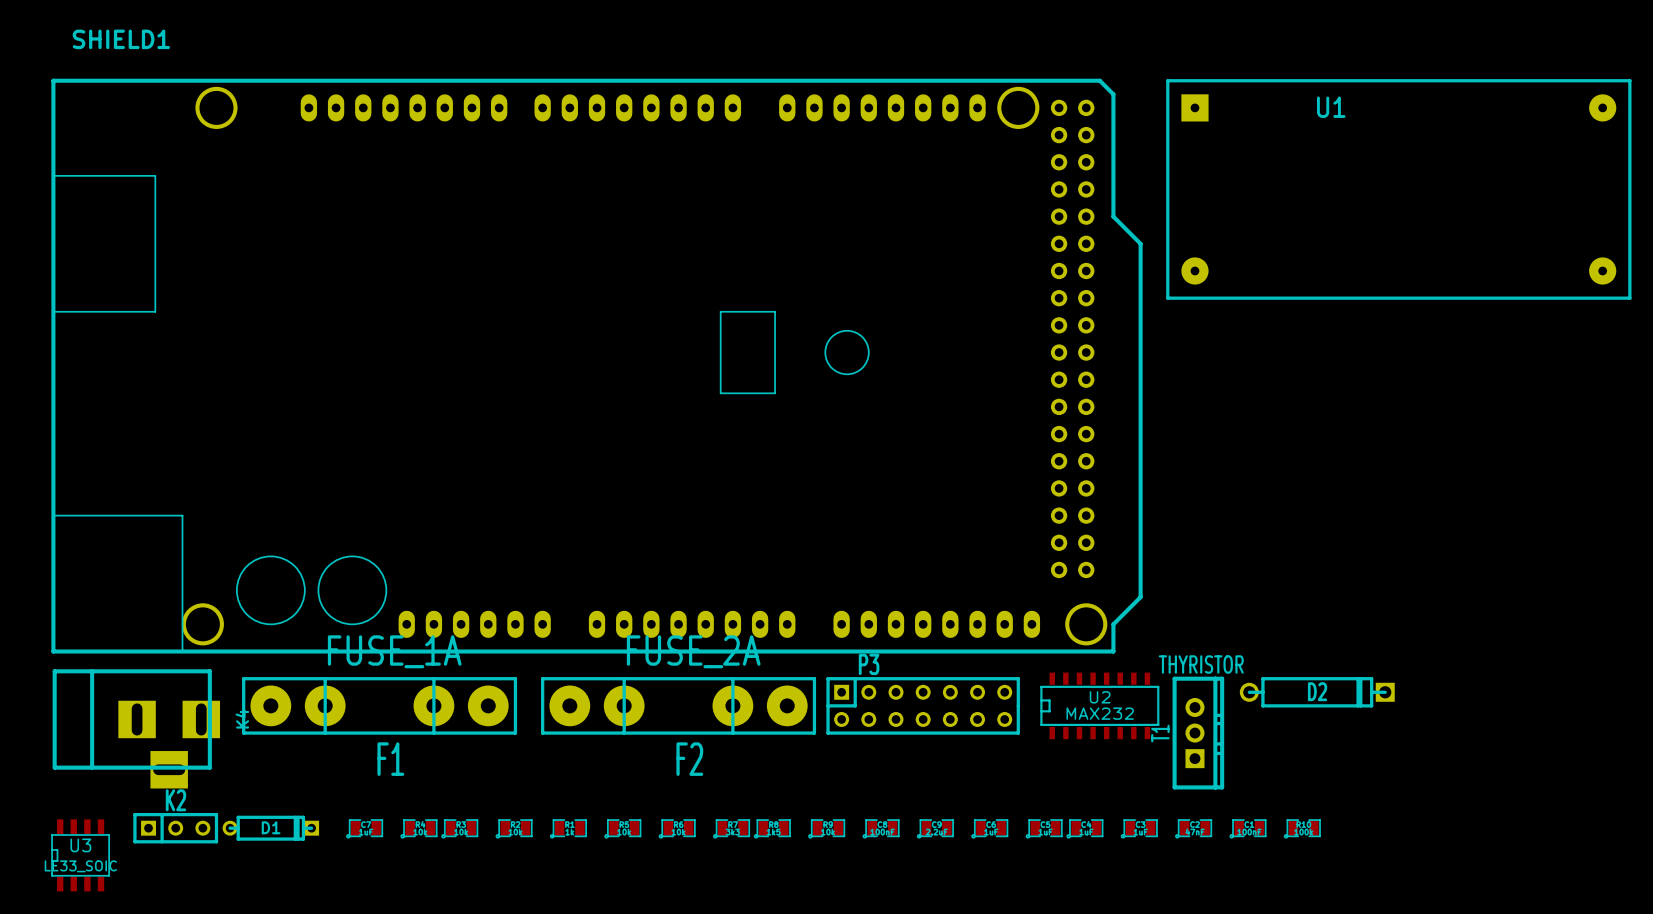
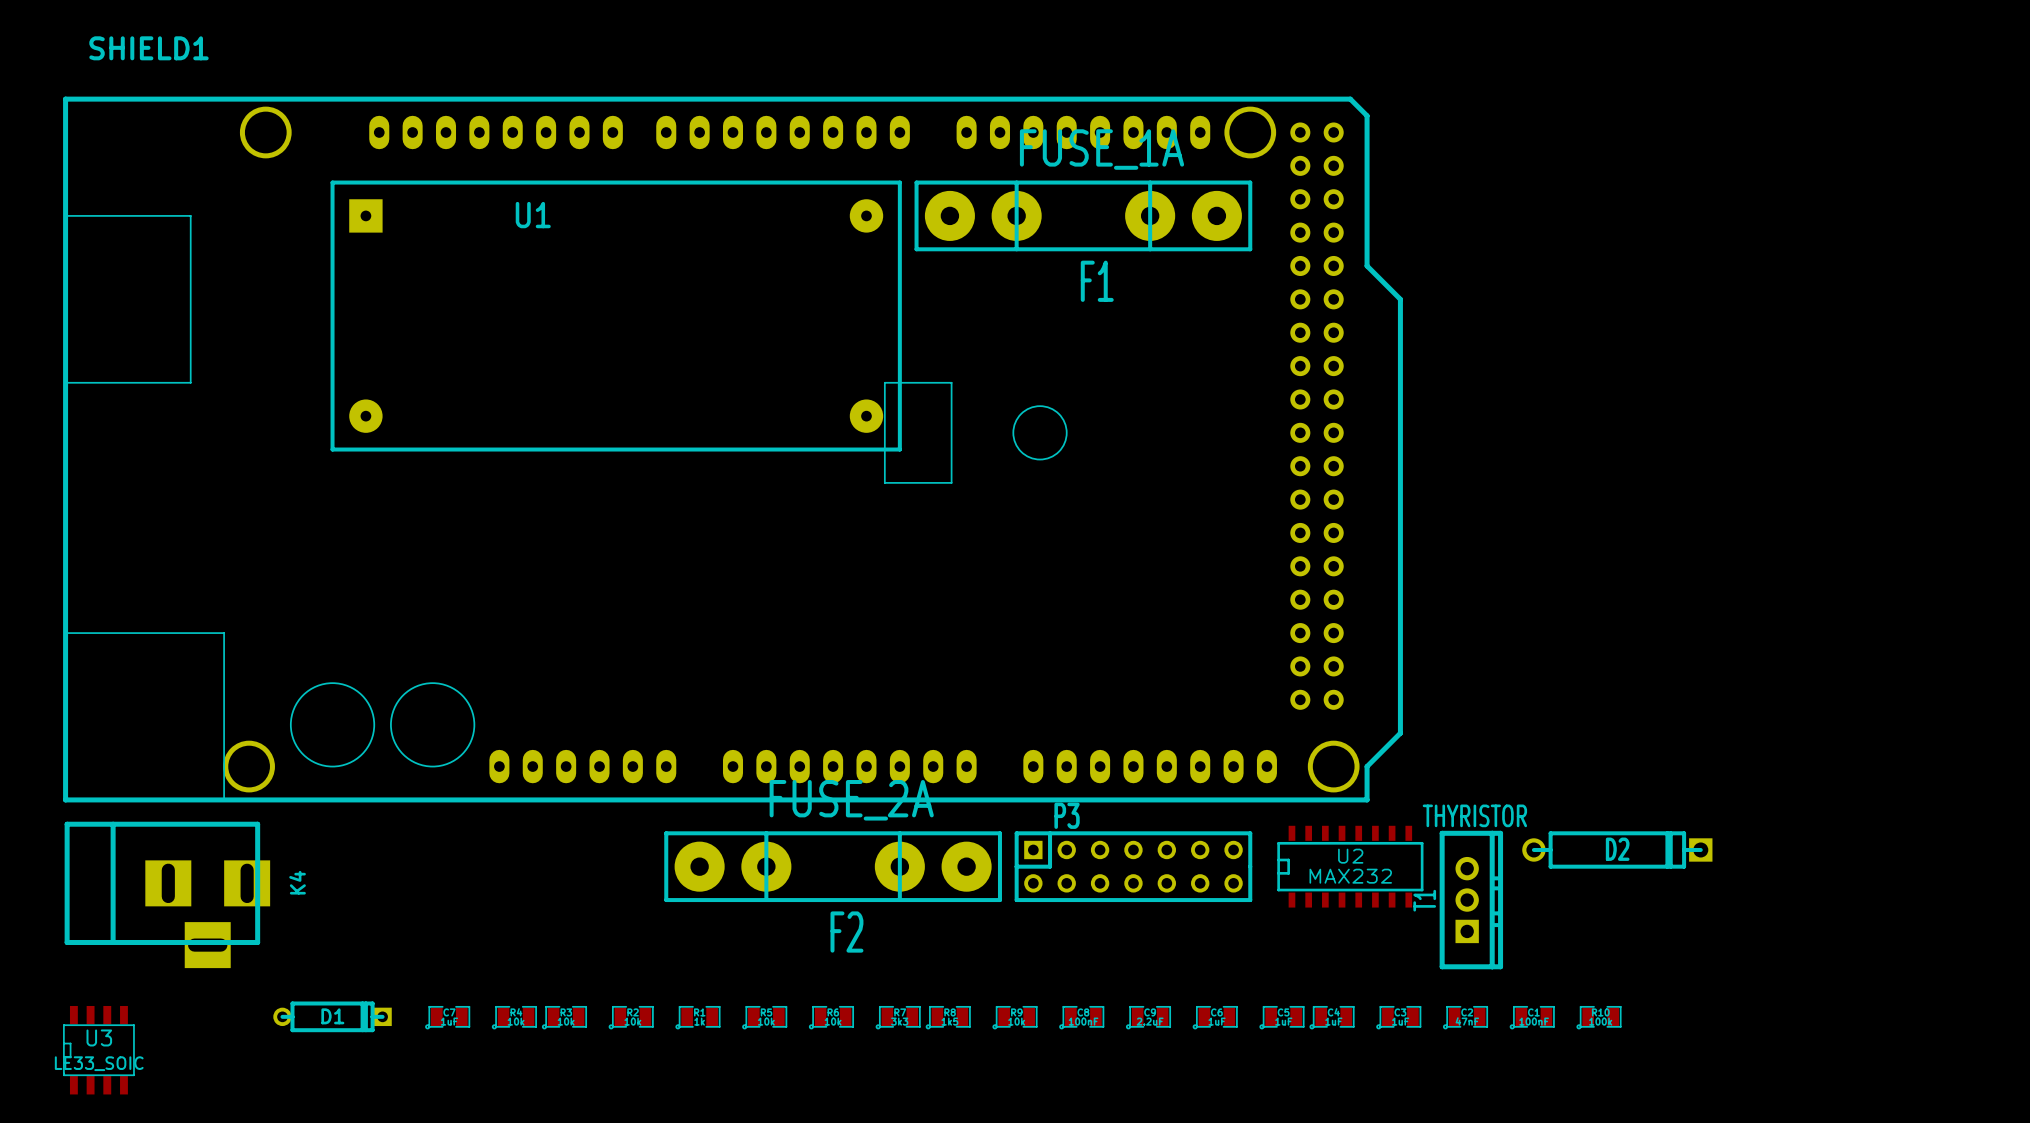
U1 position: (1398, 189) -> (616, 316)
F1 position: (379, 705) -> (1083, 215)
K2: (175, 828) -> none

